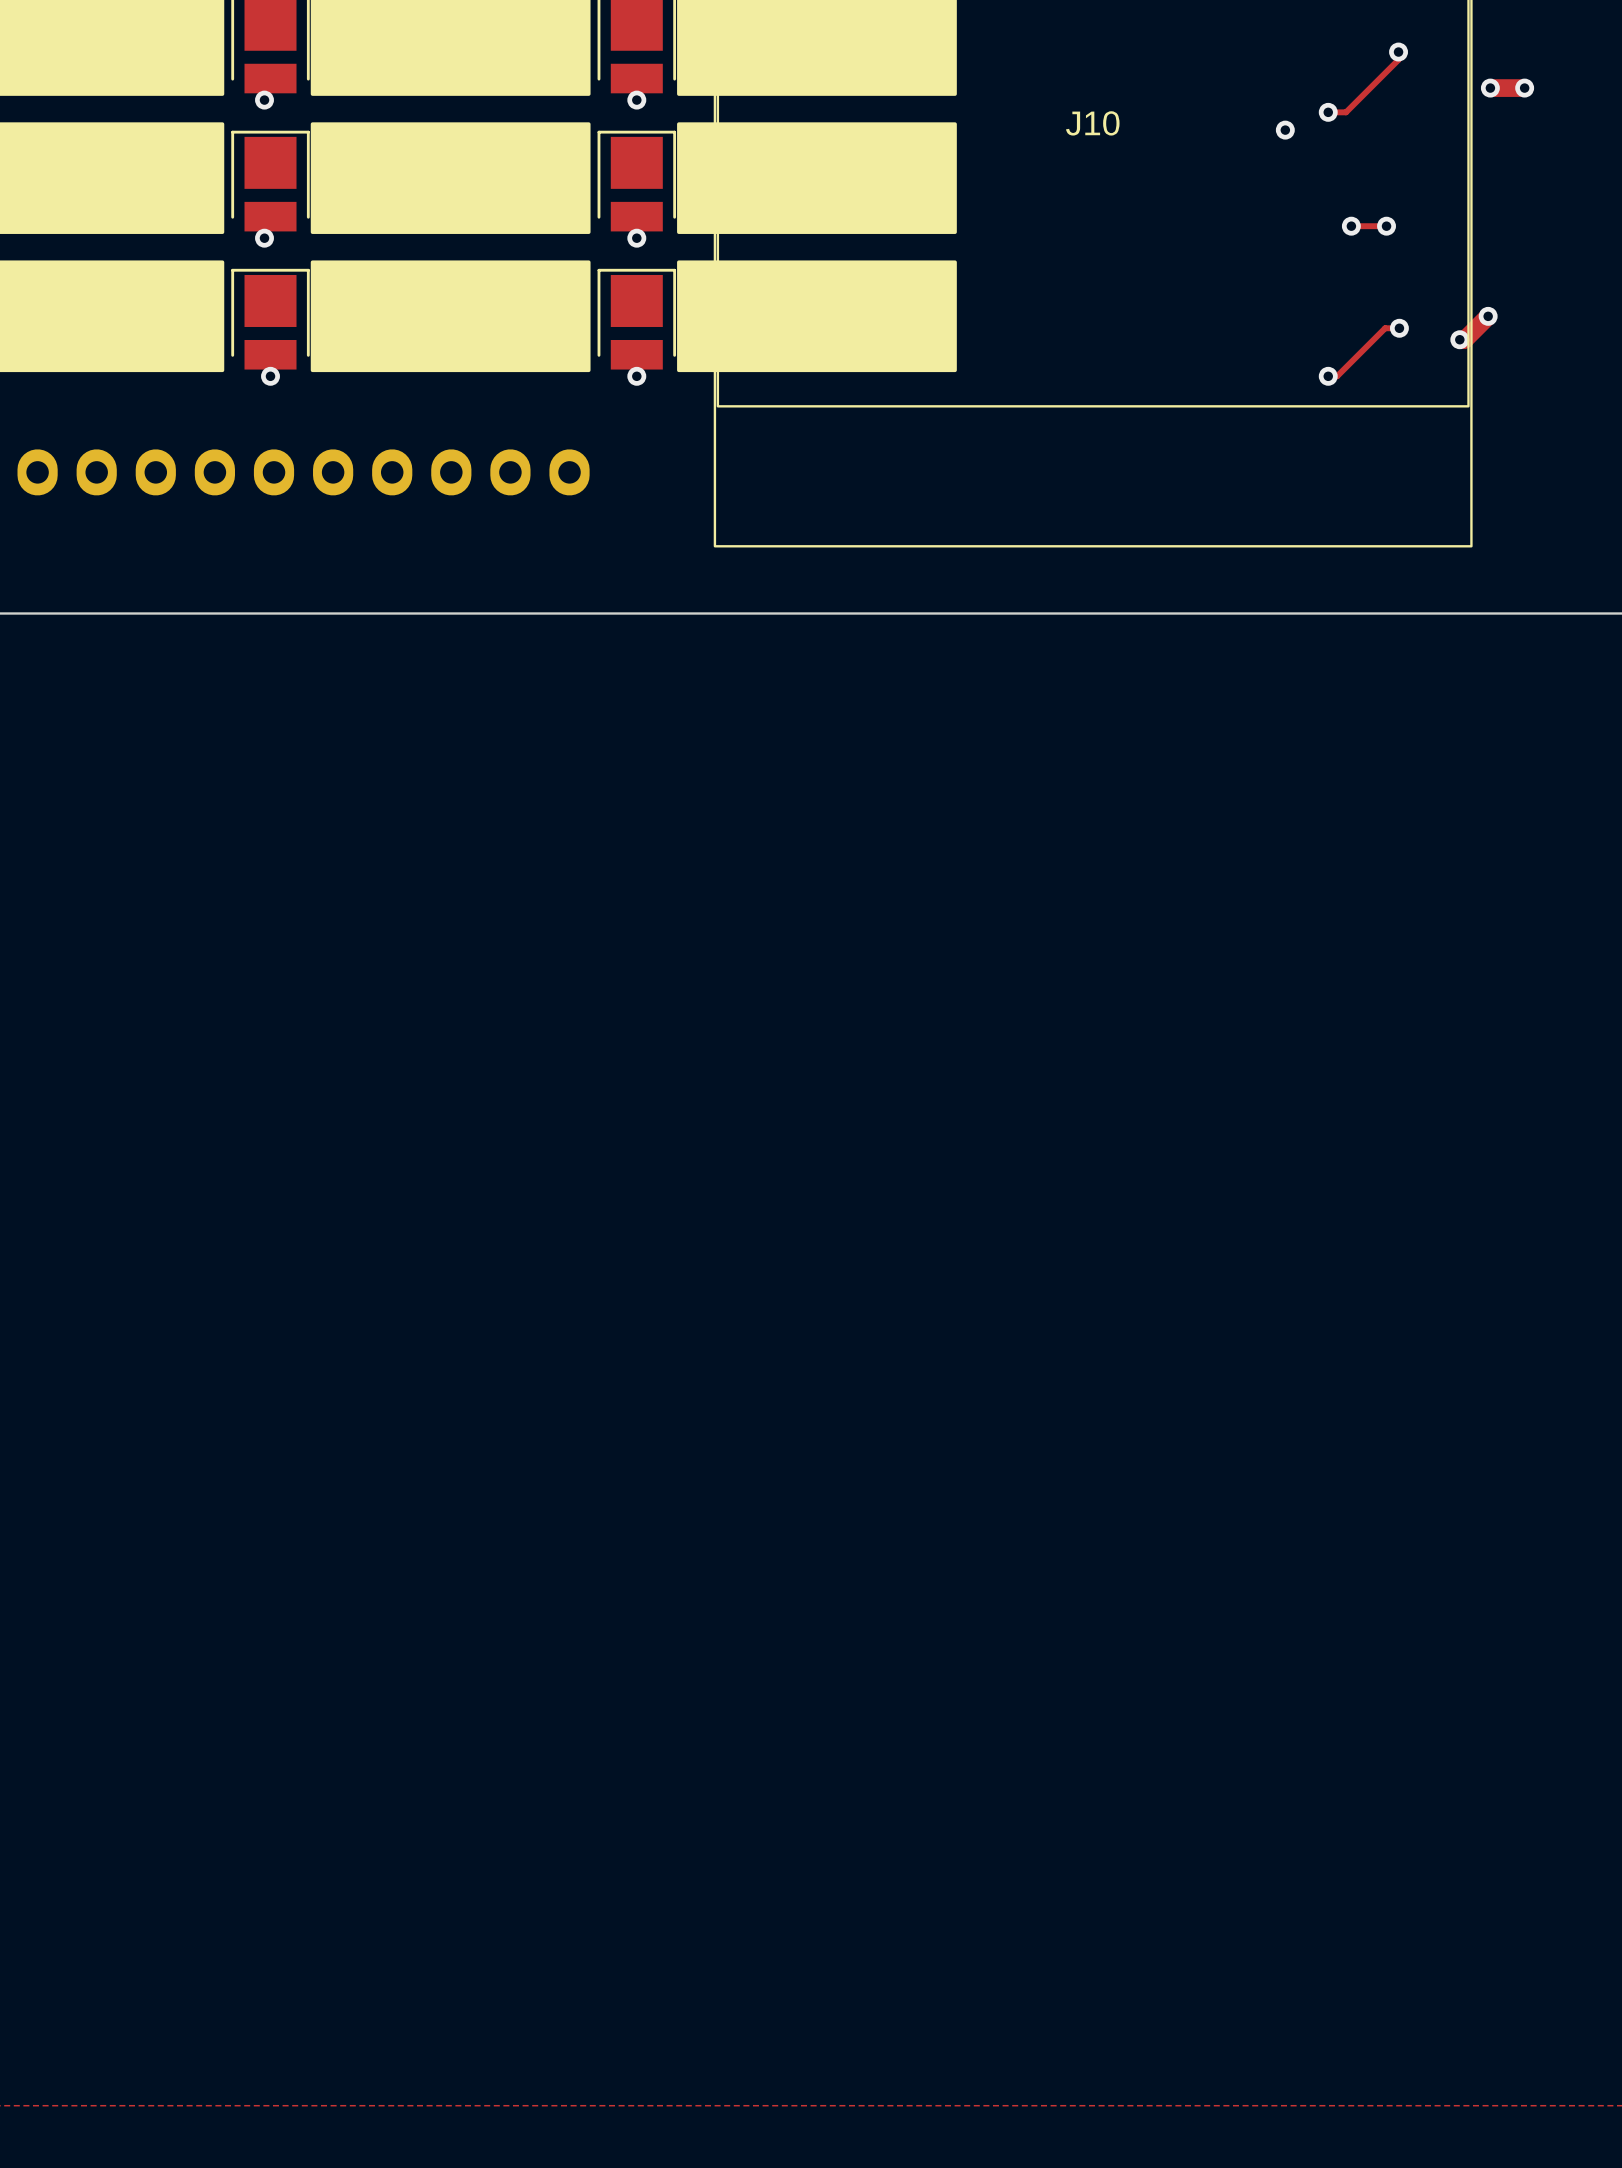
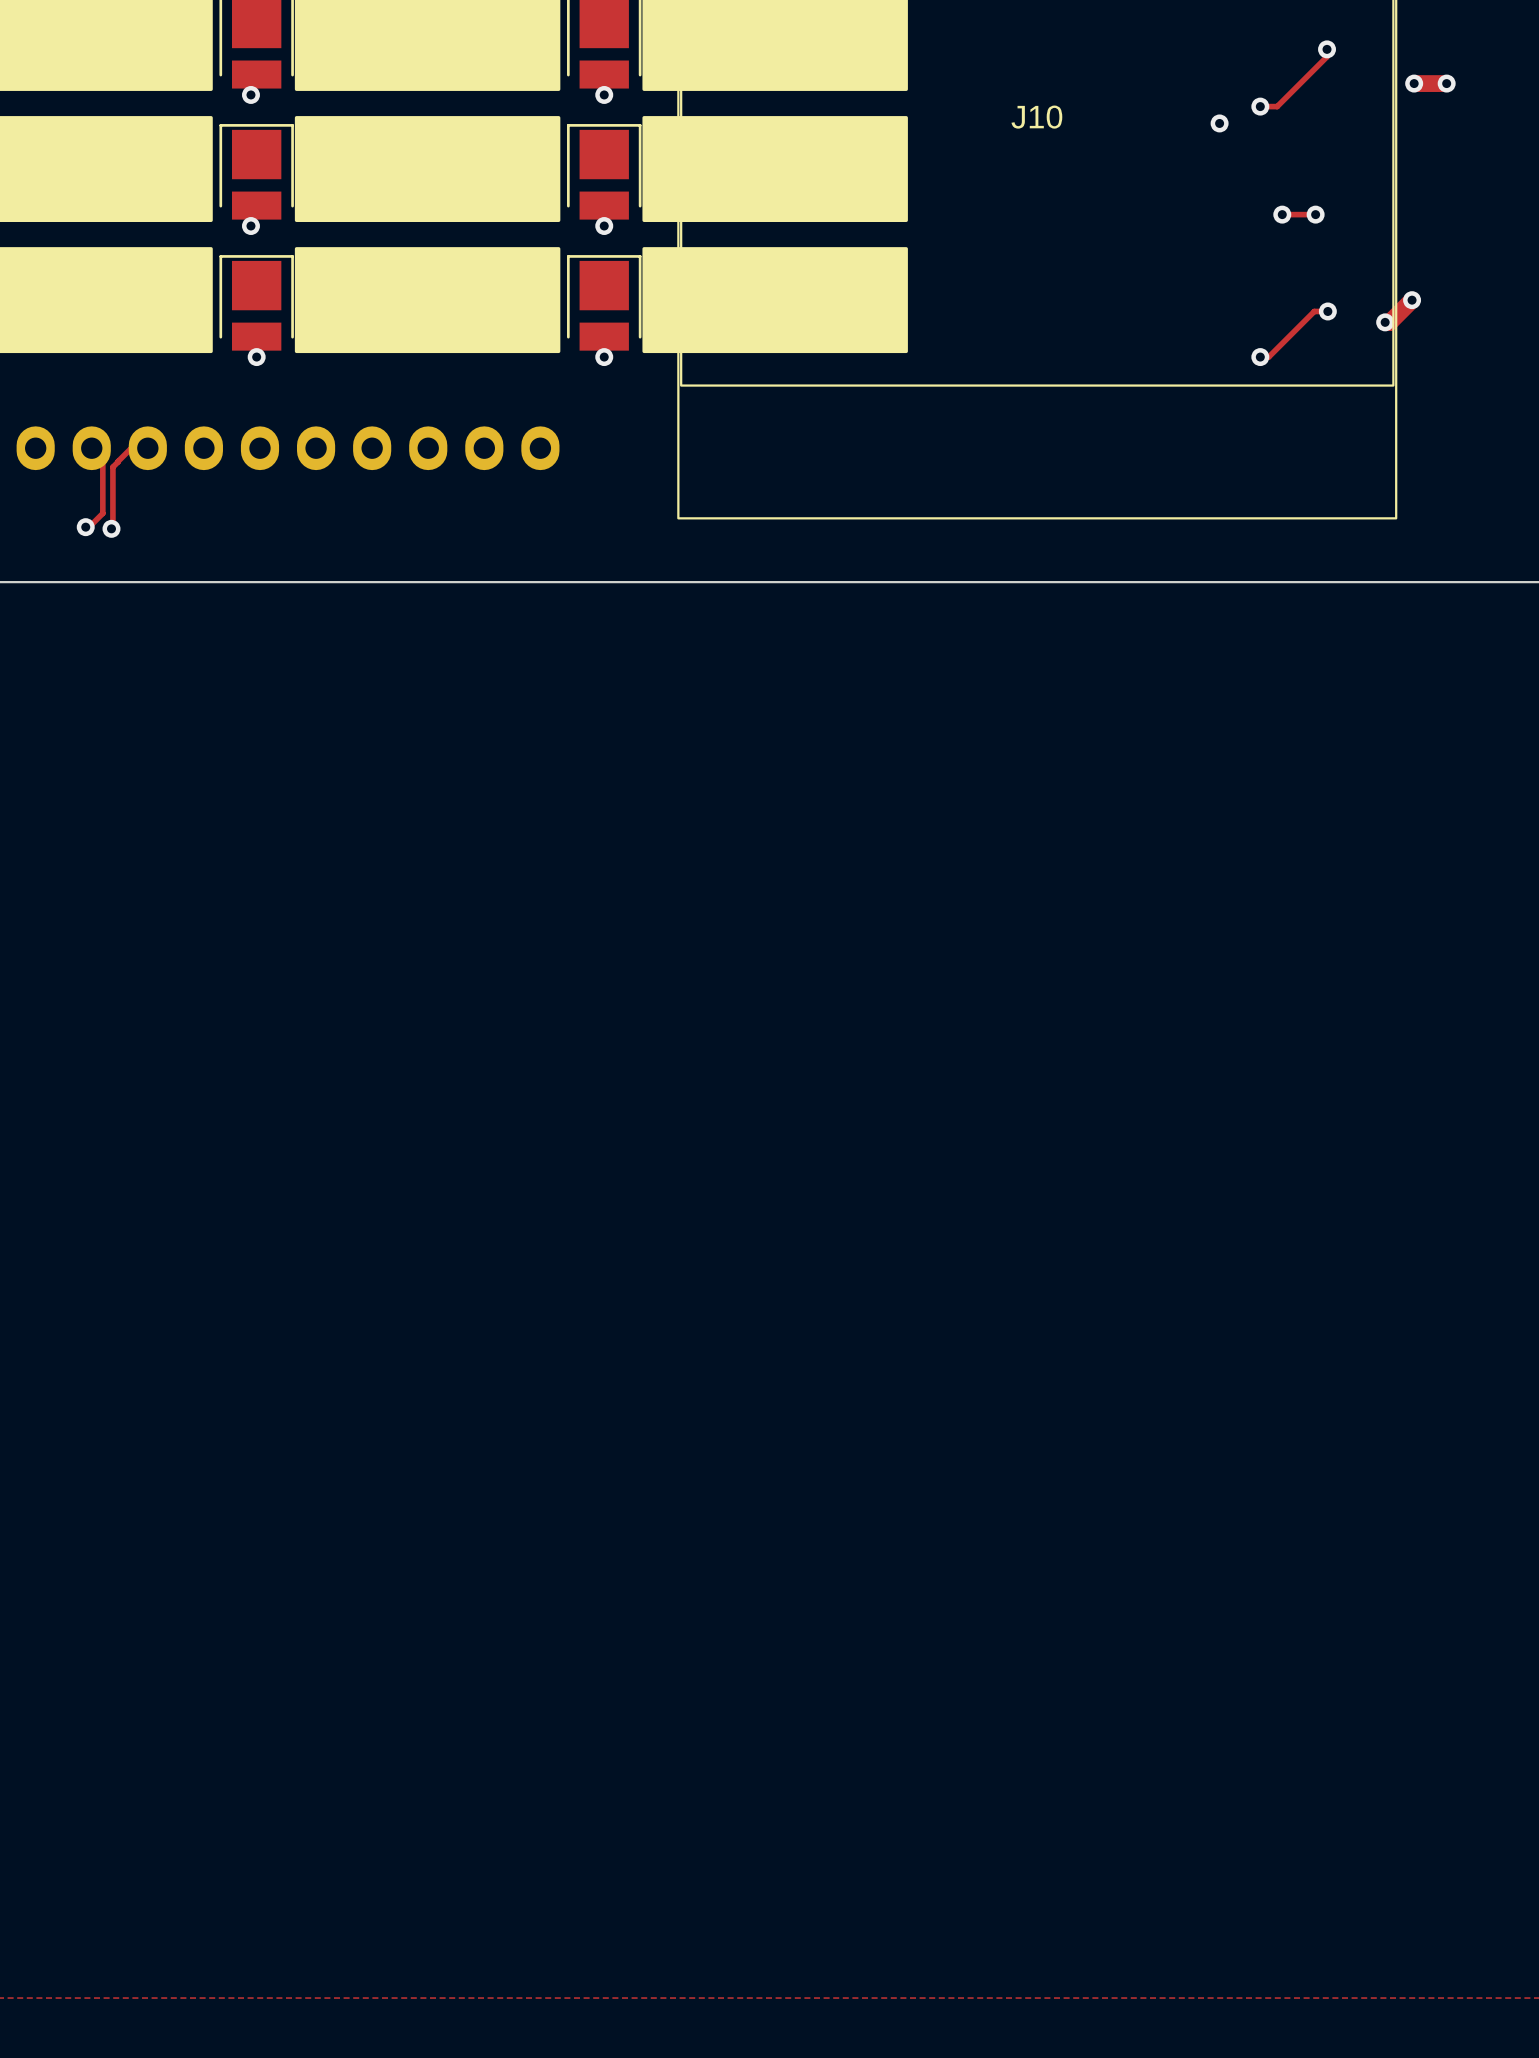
track: none -> (91, 448) (102, 459) (102, 513) (89, 527) (85, 527)
track: none -> (147, 448) (131, 448) (112, 467) (111, 528)
via: none -> (85, 527)
via: none -> (111, 528)

